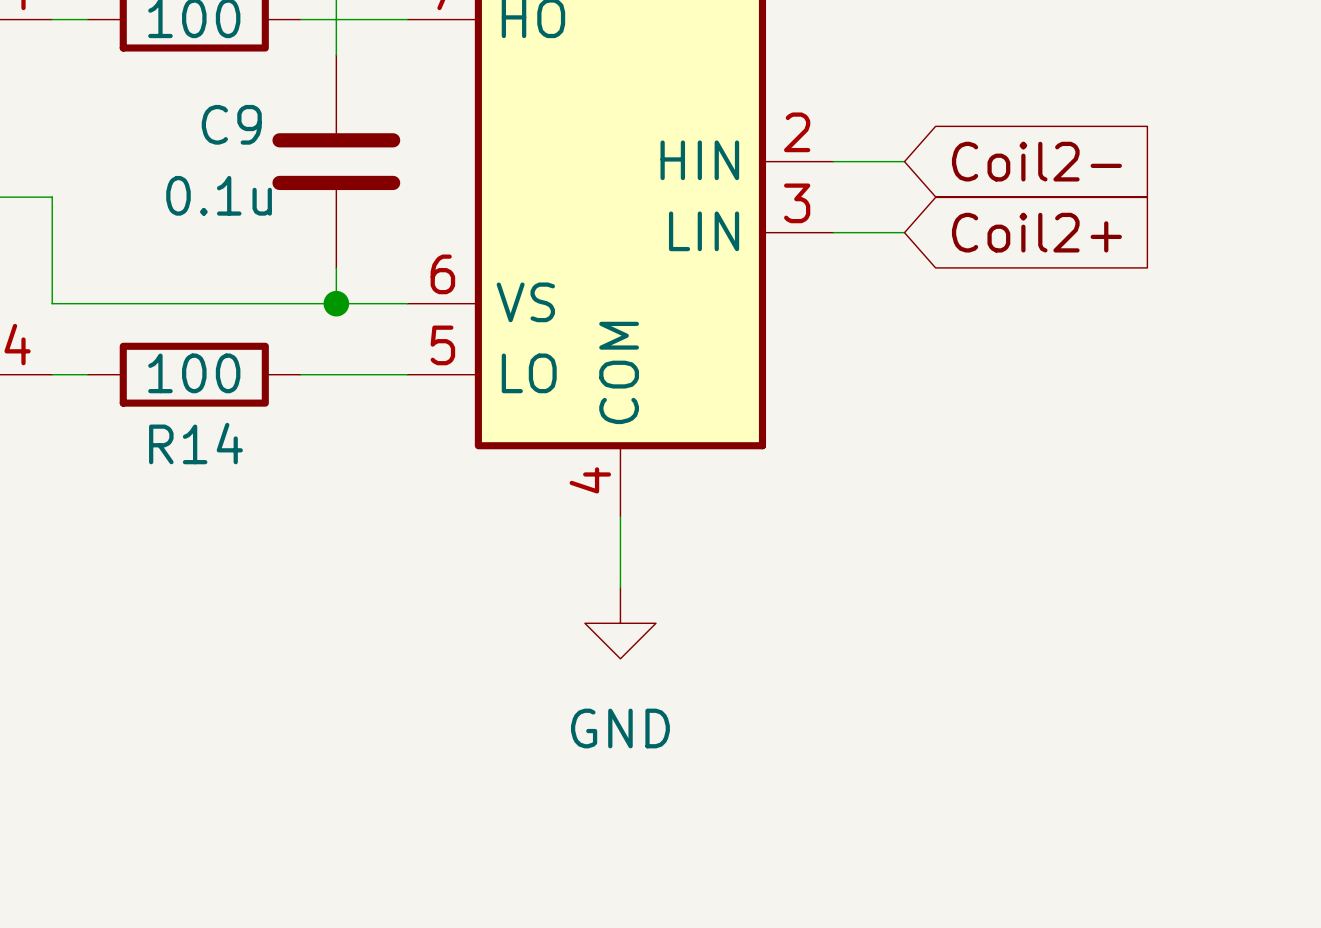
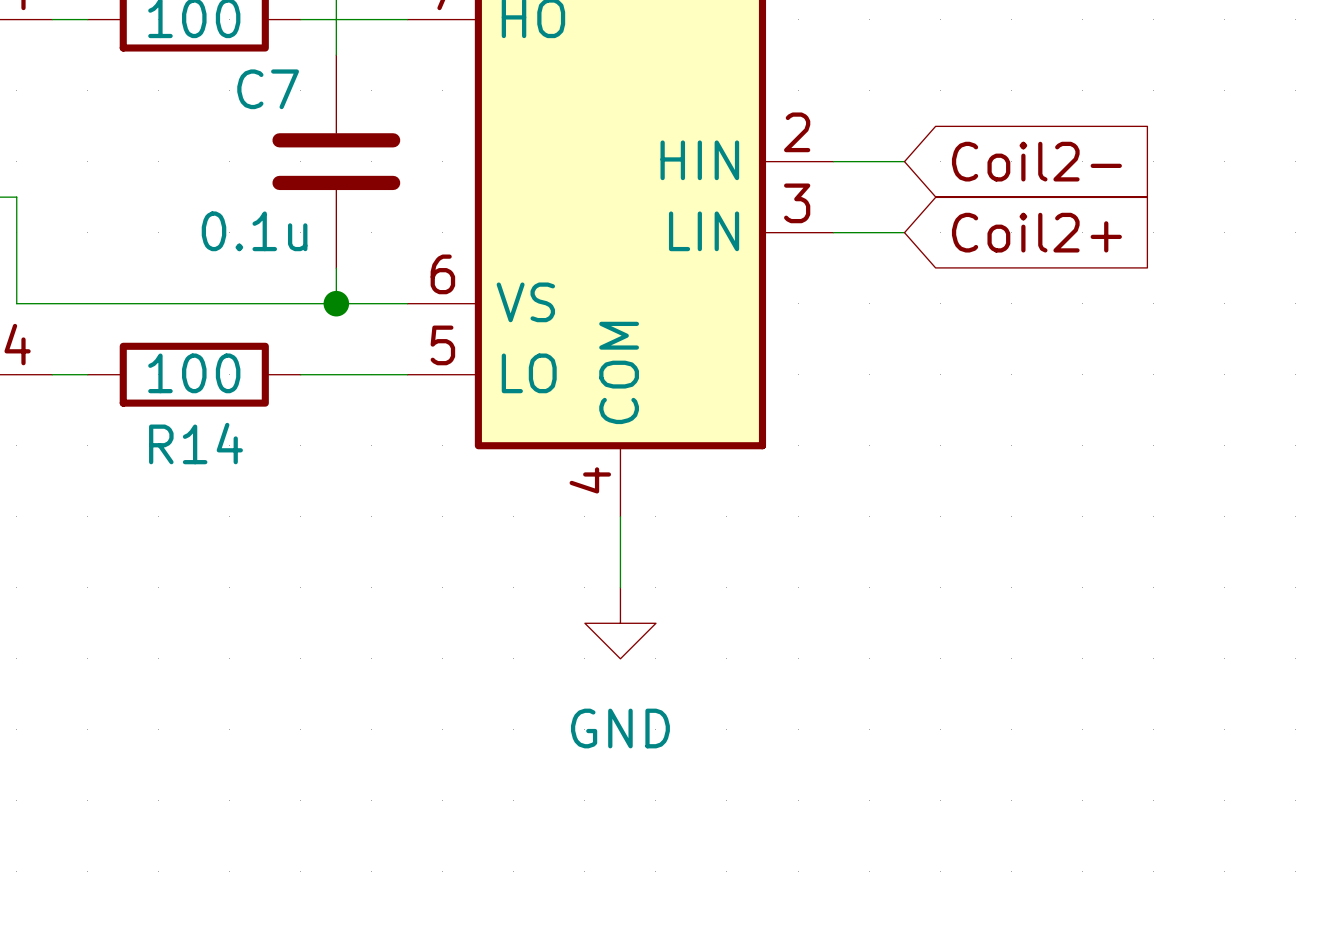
C9 name: C9 (231, 124) -> C7 (268, 89)
C9 value position: 0.1u (219, 195) -> 0.1u (254, 231)
wire: (16, 197) (52, 197) (52, 303) -> (16, 197) (16, 303) (52, 303)

